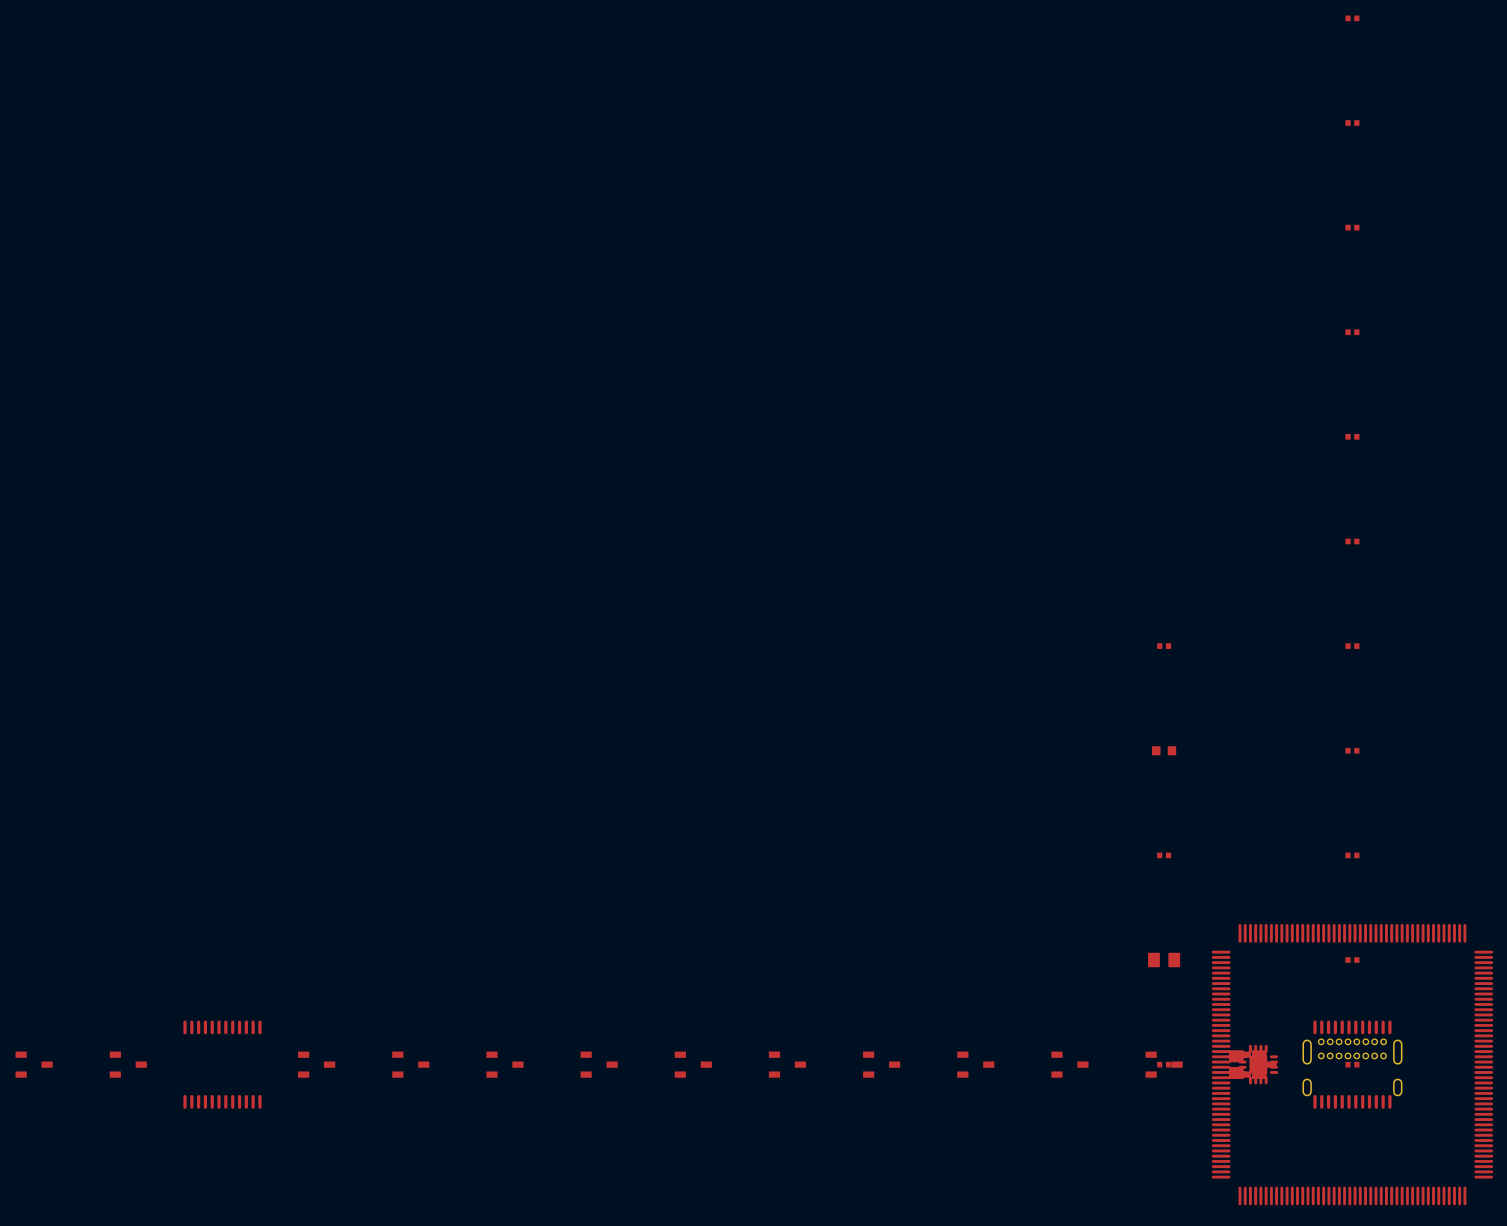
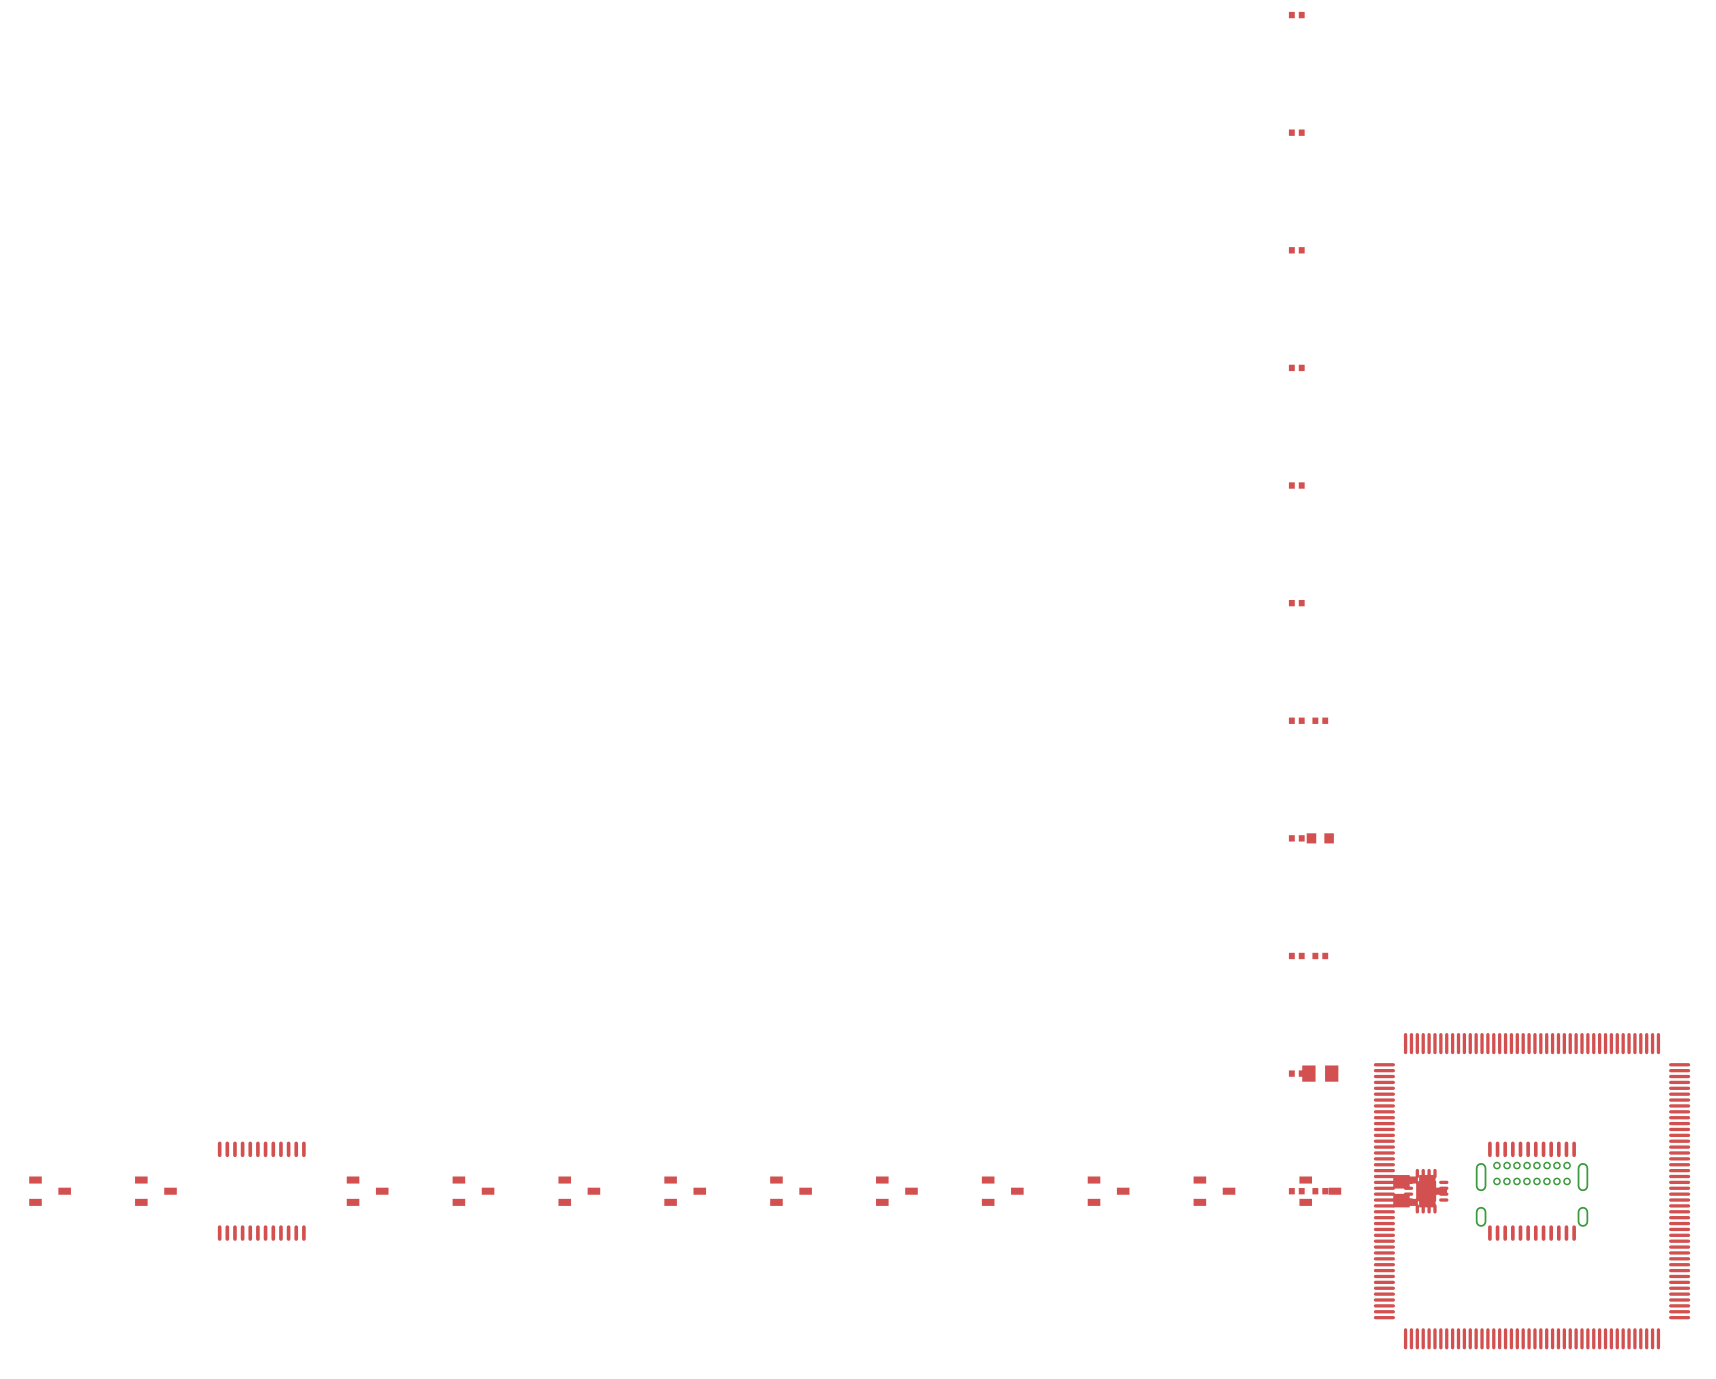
part: none -> (1296, 15)
part: (1352, 18) -> none
part: none -> (1296, 132)
part: (1352, 122) -> none
part: none -> (1296, 250)
part: (1352, 227) -> none
part: none -> (1296, 367)
part: (1352, 332) -> none
part: none -> (1296, 485)
part: (1352, 436) -> none
part: none -> (1296, 603)
part: (1352, 541) -> none
part: none -> (1296, 720)
part: (1352, 646) -> none
part: none -> (1296, 838)
part: (1352, 750) -> none
part: none -> (1296, 955)
part: (1352, 855) -> none
part: none -> (1296, 1073)
part: (1352, 960) -> none
part: none -> (1296, 1191)
part: (1352, 1064) -> none

